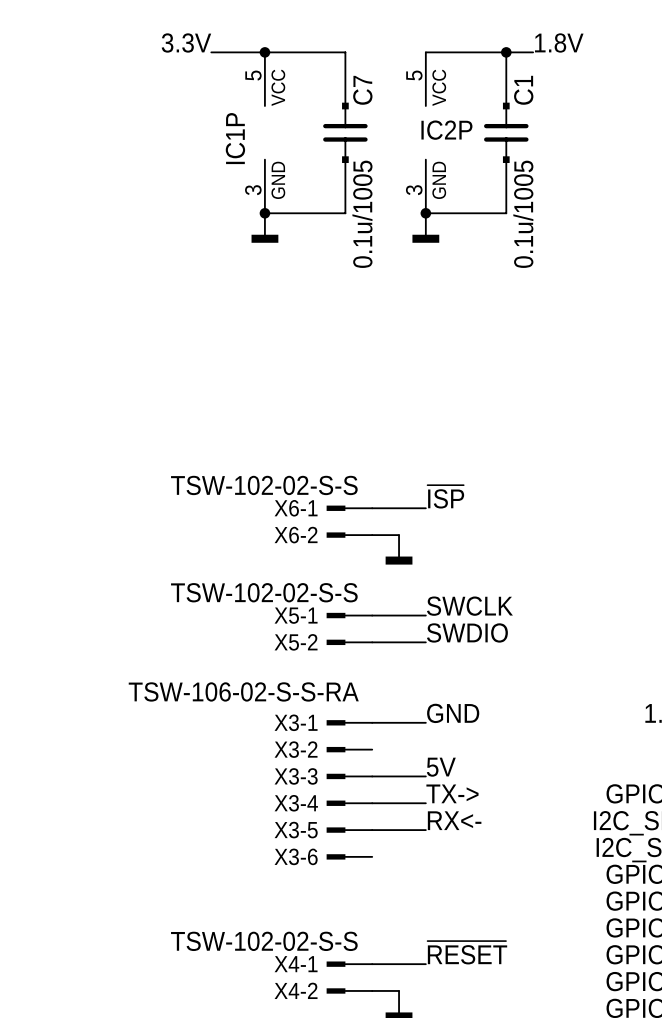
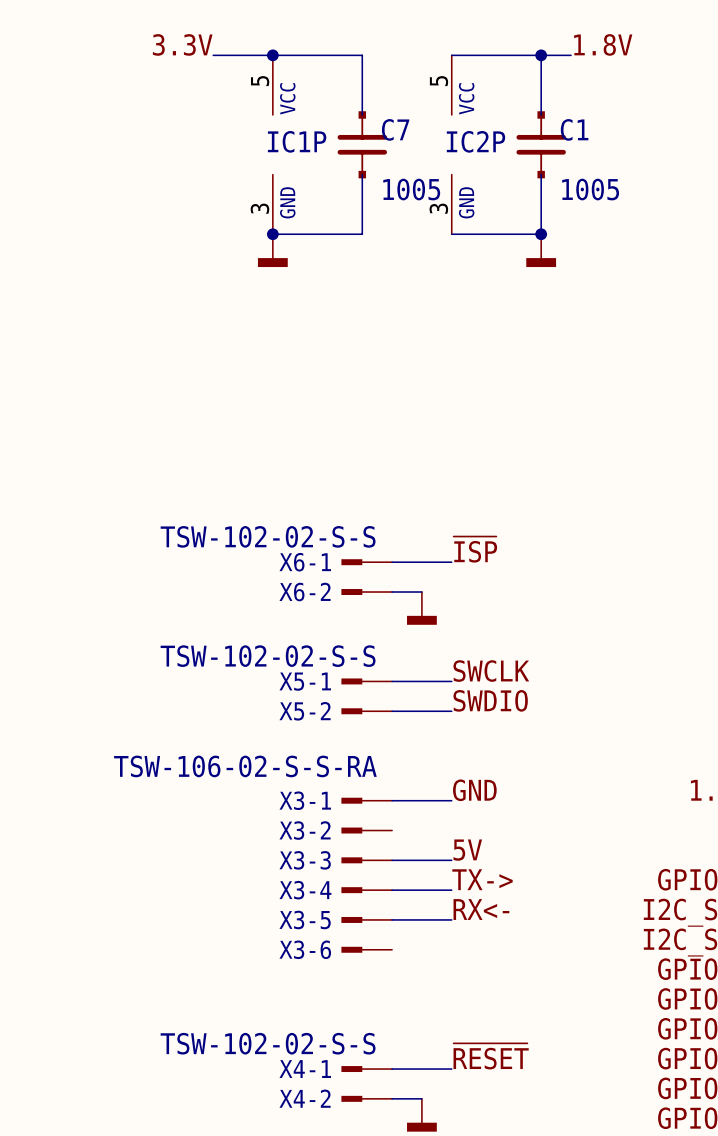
C7 name rotation: 0° (362, 90) -> 90° clockwise (395, 129)
C1 name rotation: 0° (523, 90) -> 90° clockwise (574, 129)
IC1P name rotation: 0° (235, 138) -> 90° clockwise (297, 141)
junction: (425, 213) -> none
junction: none -> (541, 234)
C7 value: 0.1u/1005 (362, 214) -> 1005 (411, 189)
C1 value: 0.1u/1005 (523, 214) -> 1005 (590, 189)
power symbol position: (425, 228) -> (541, 250)

